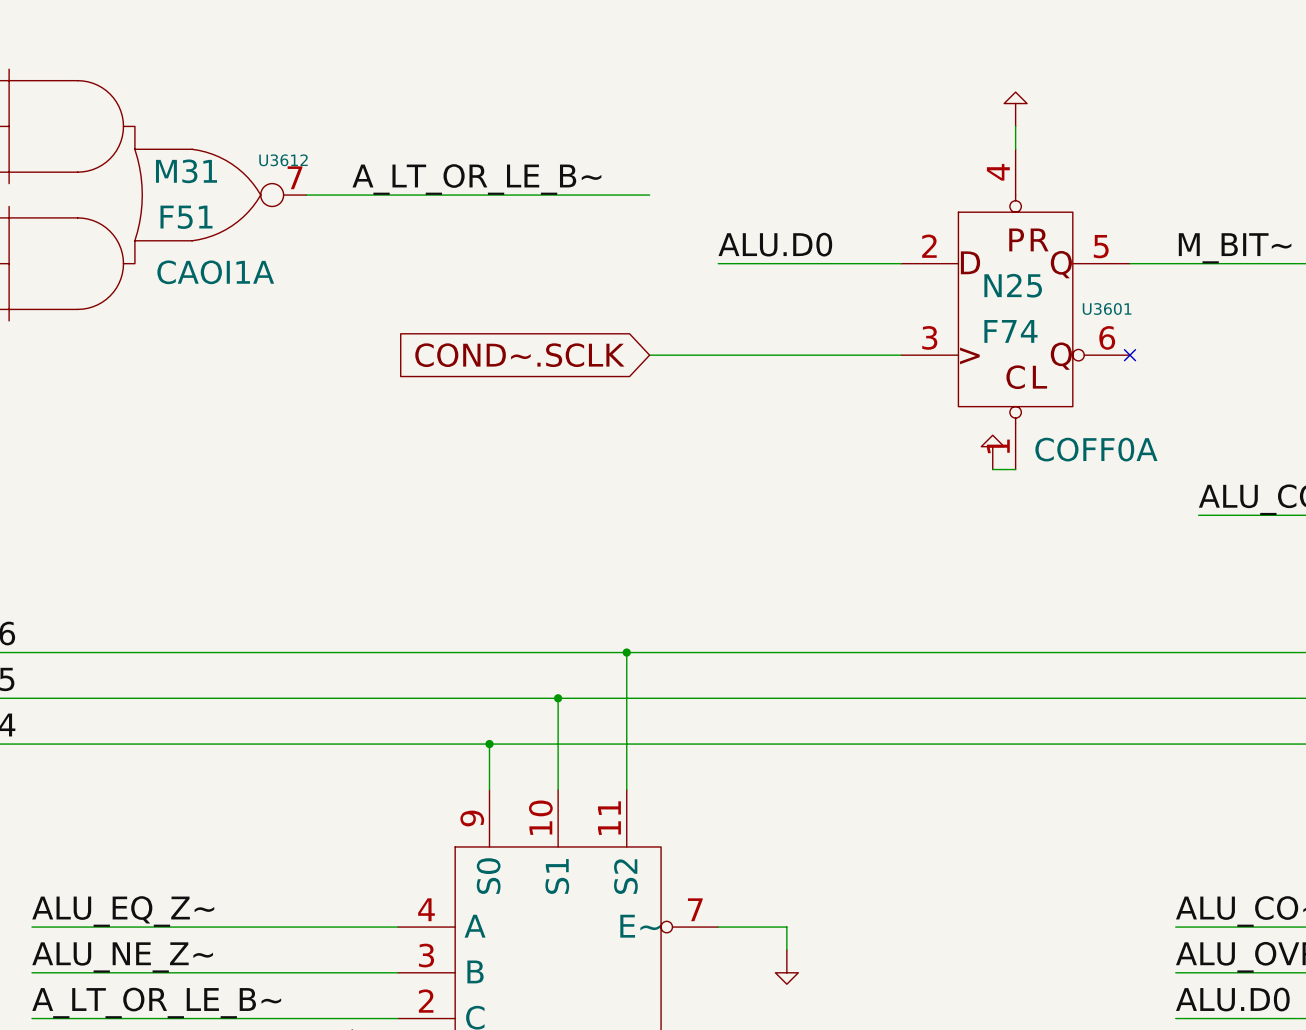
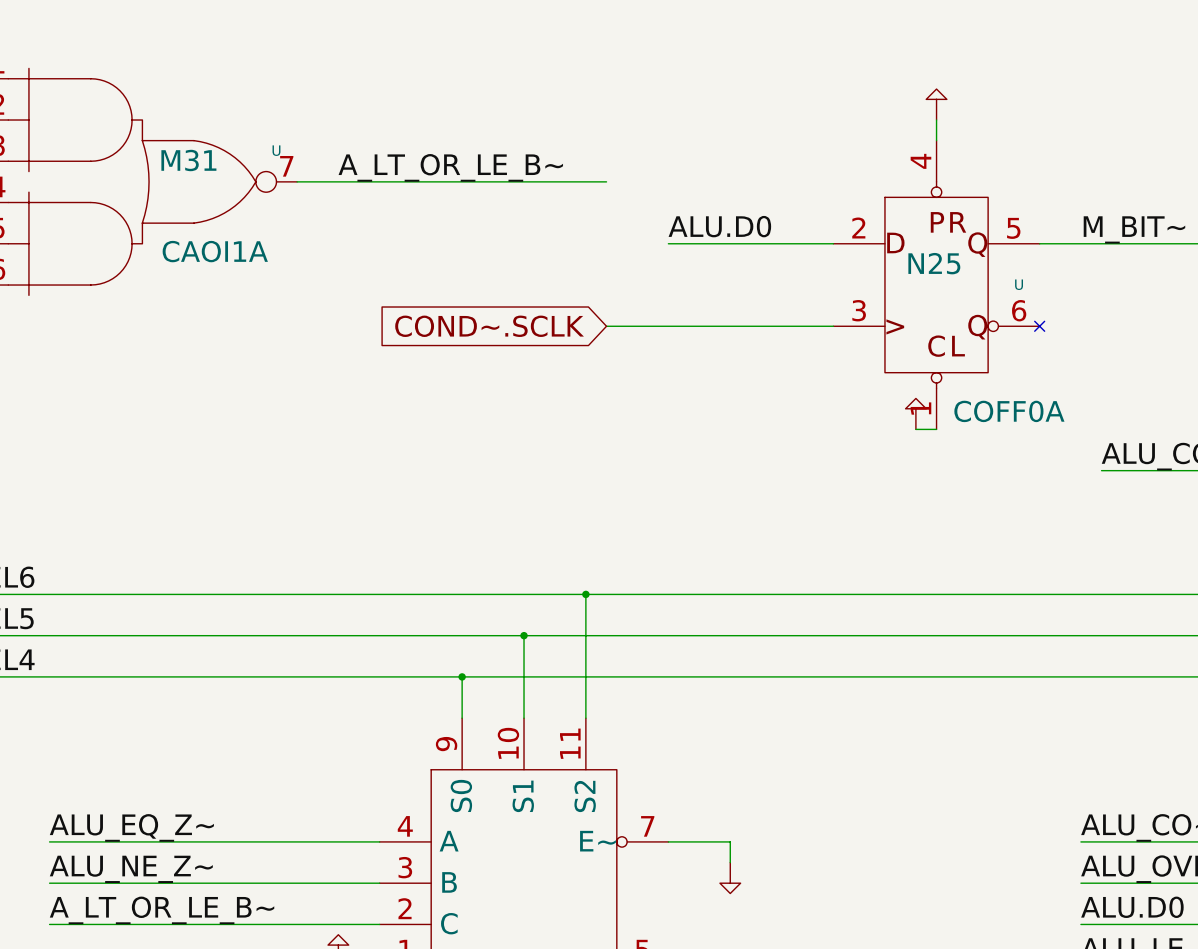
U3612 name: U3612 (283, 160) -> U (276, 150)
U3612 value: F51 (186, 217) -> none
U3601 name: U3601 (1107, 309) -> U (1019, 284)
U3601 value: F74 (1010, 331) -> none

